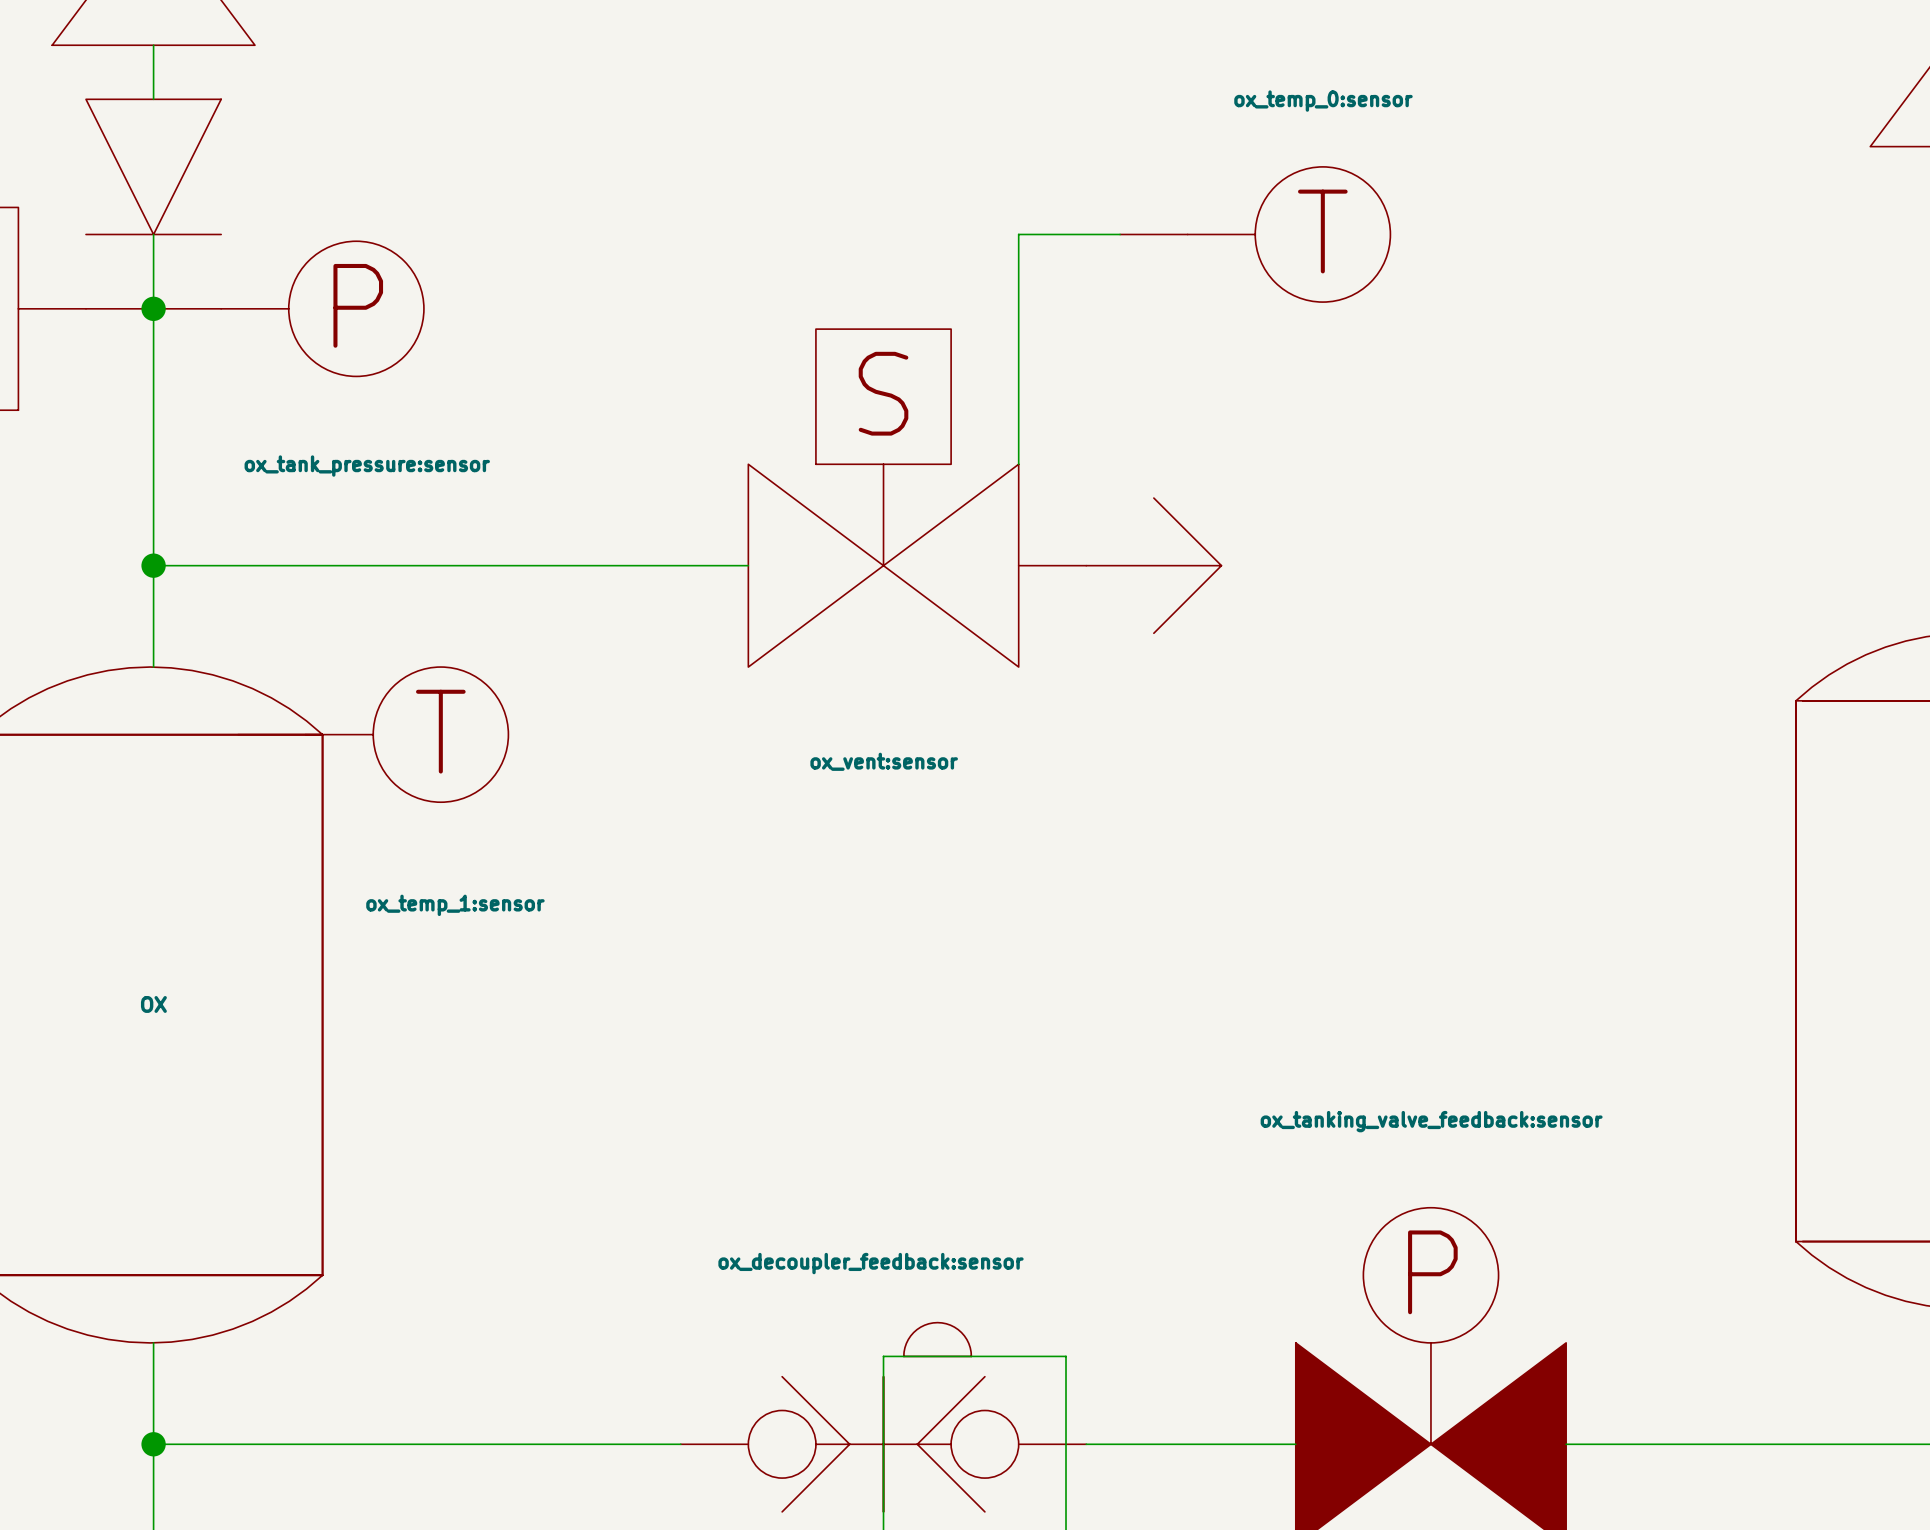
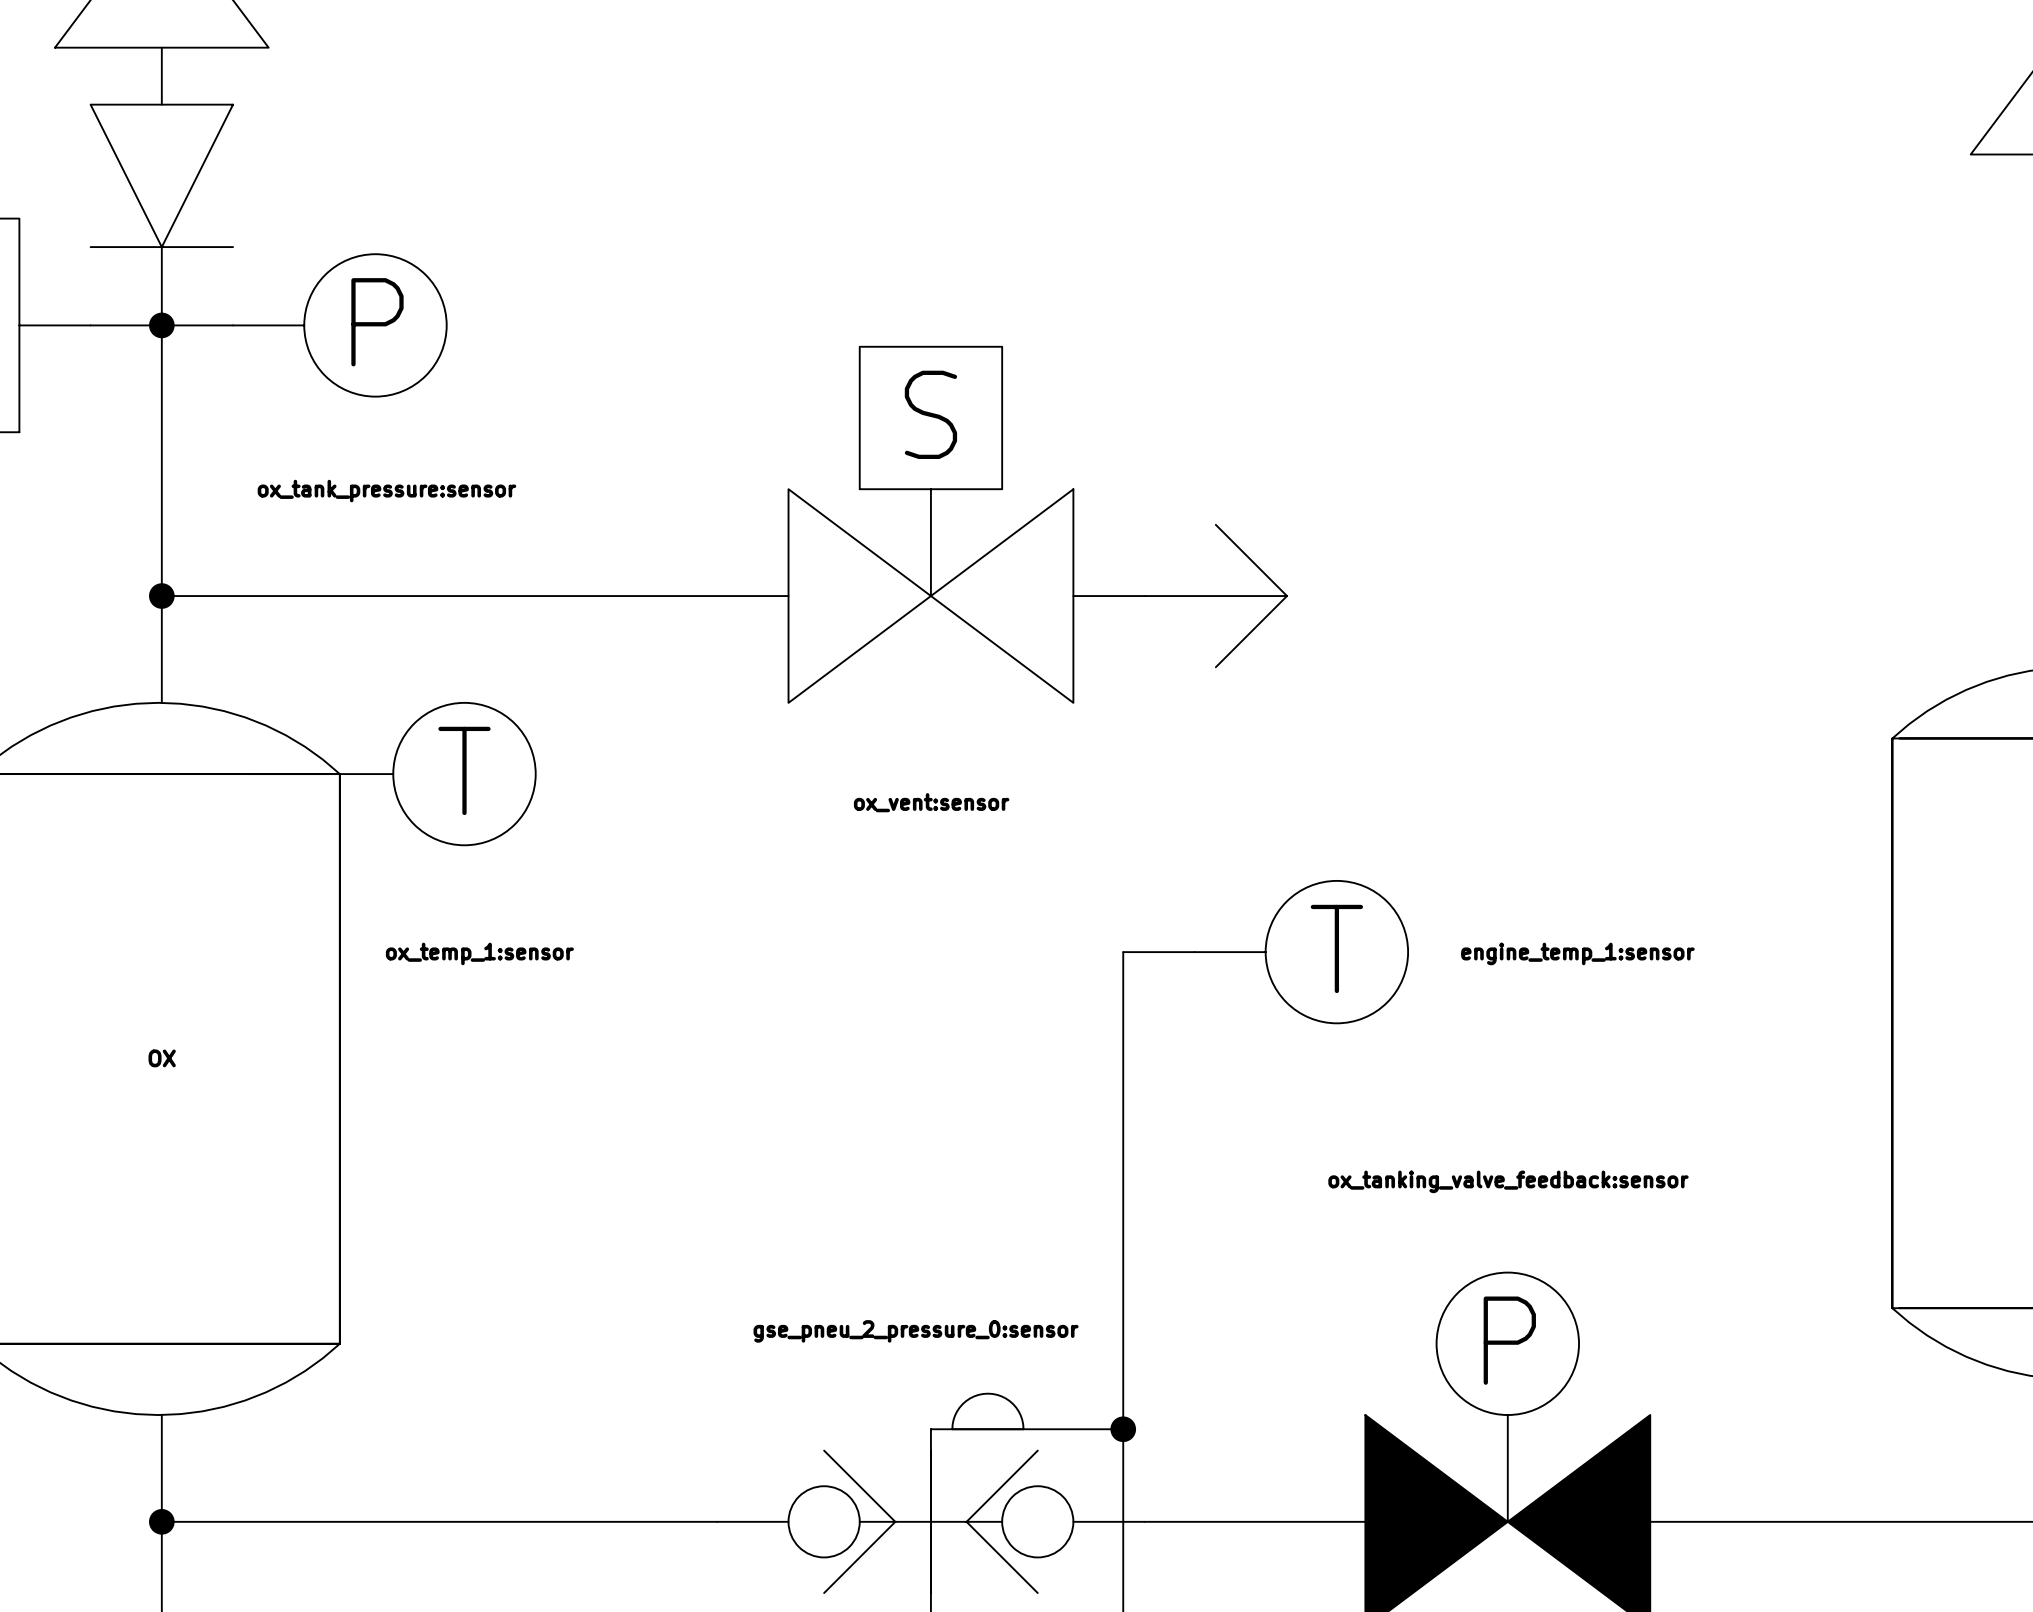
wire: (1120, 234) (1018, 234) (1018, 464) -> none
part: ox_temp_0:sensor (1255, 234) -> none
wire: none -> (1123, 952) (1123, 1429)
part: none -> engine_temp_1:sensor (1265, 952)
part value: ox_decoupler_feedback:sensor (871, 1263) -> gse_pneu_2_pressure_0:sensor (916, 1331)
junction: none -> (1123, 1429)

